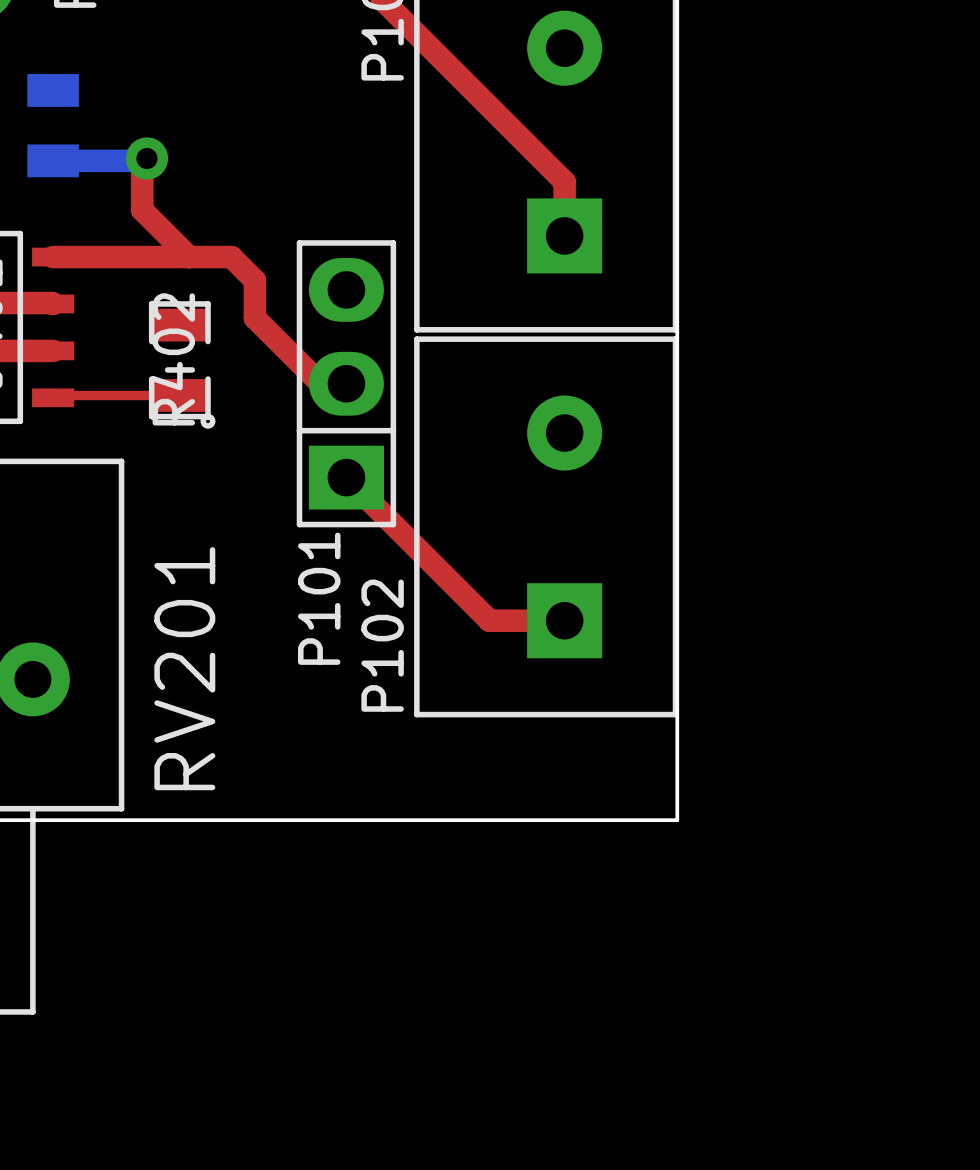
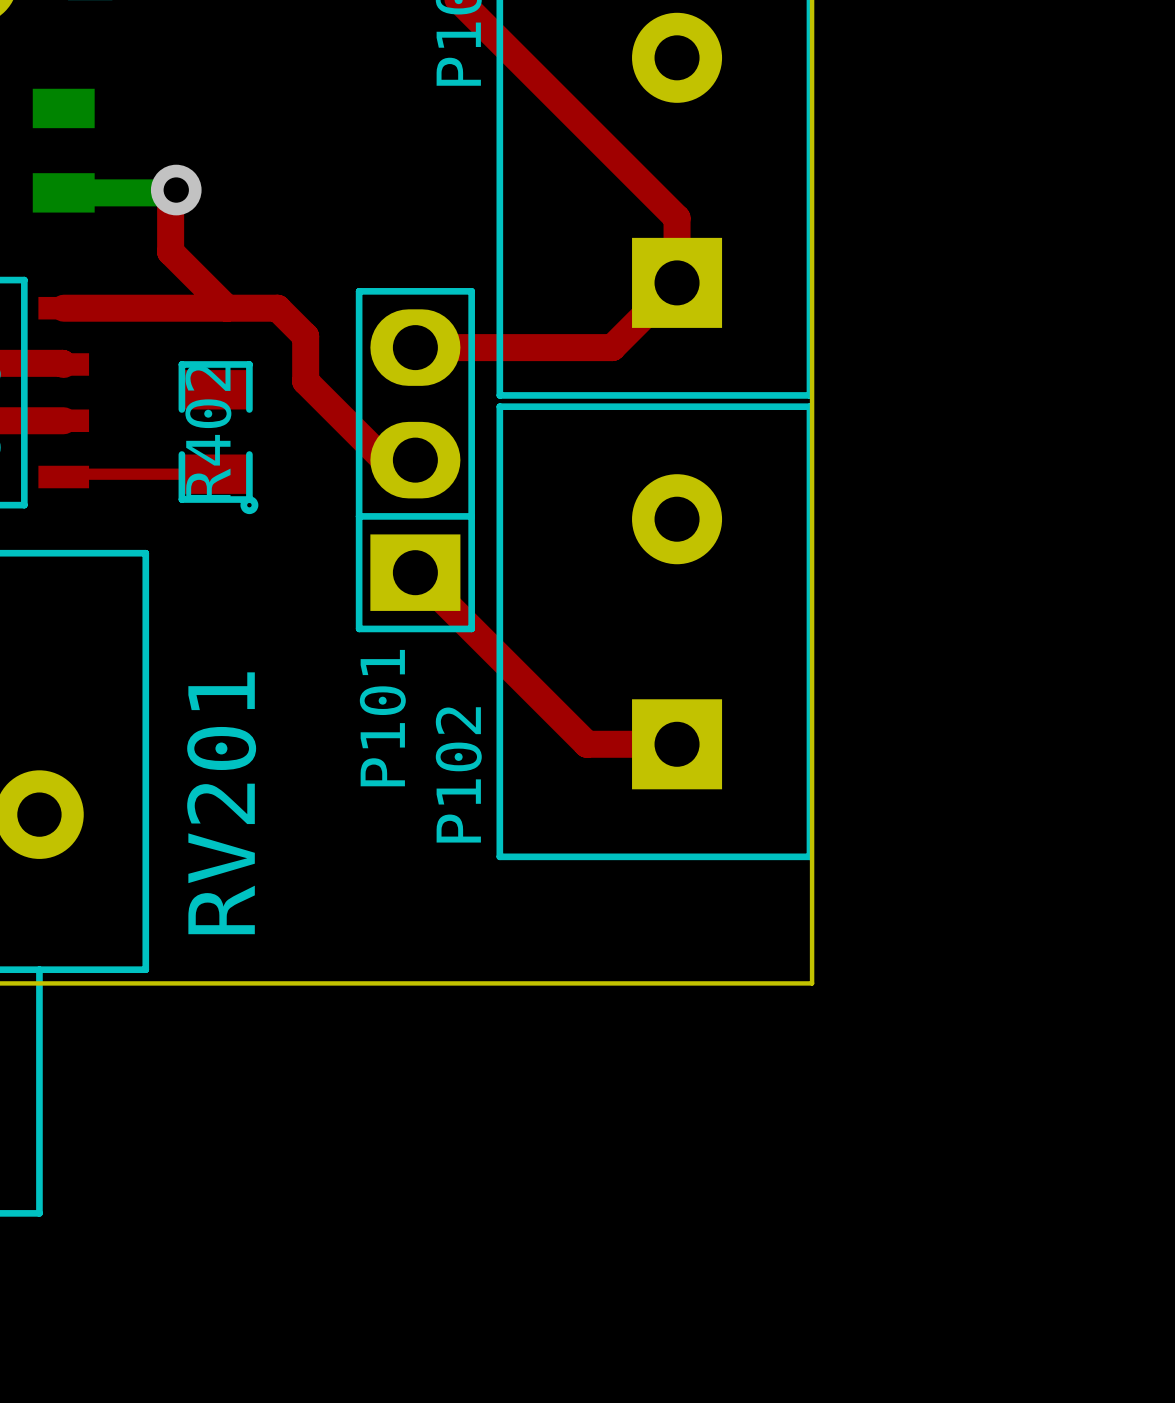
top track: none -> (677, 282) (612, 347) (415, 347)

